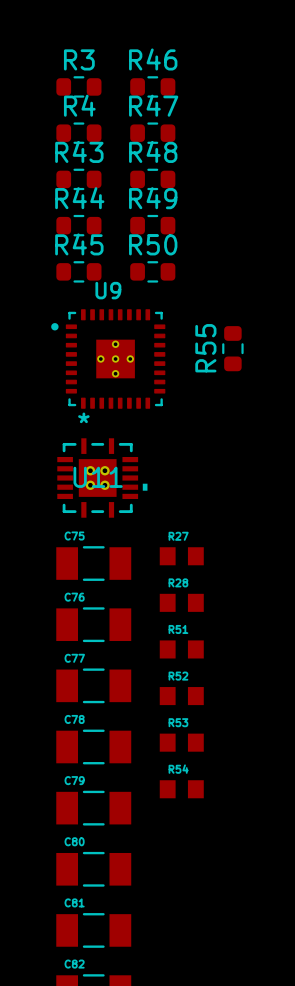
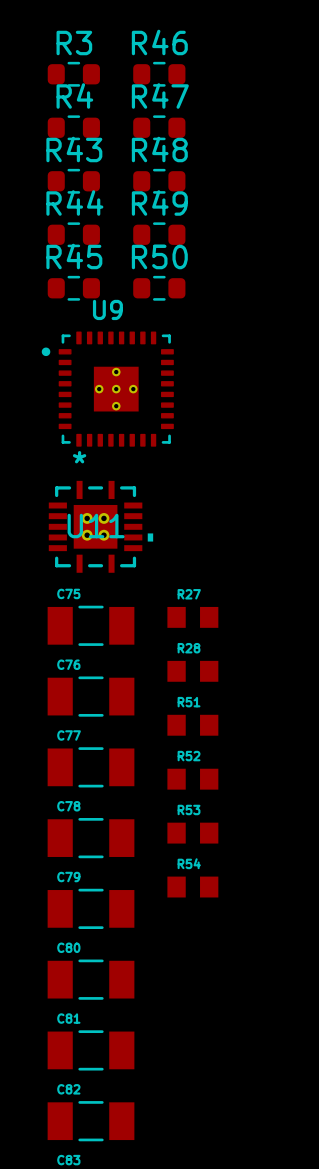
R55: (232, 348) -> none

